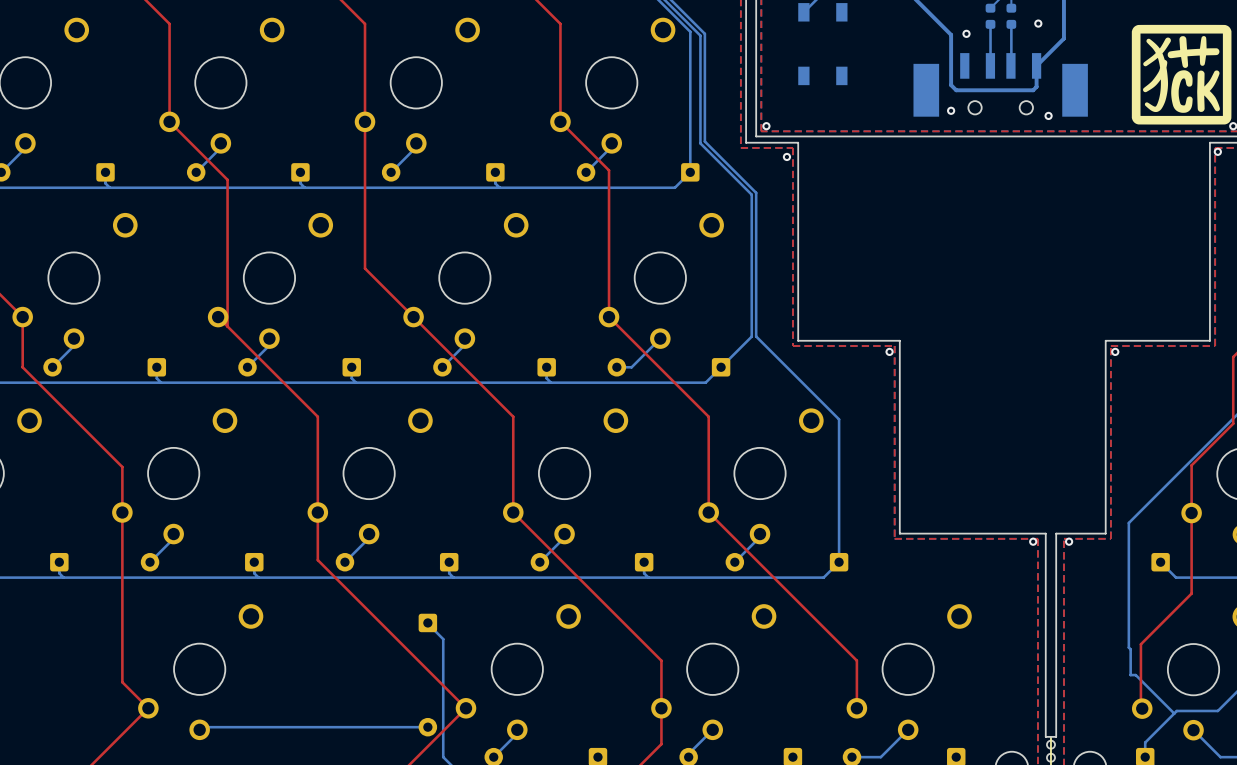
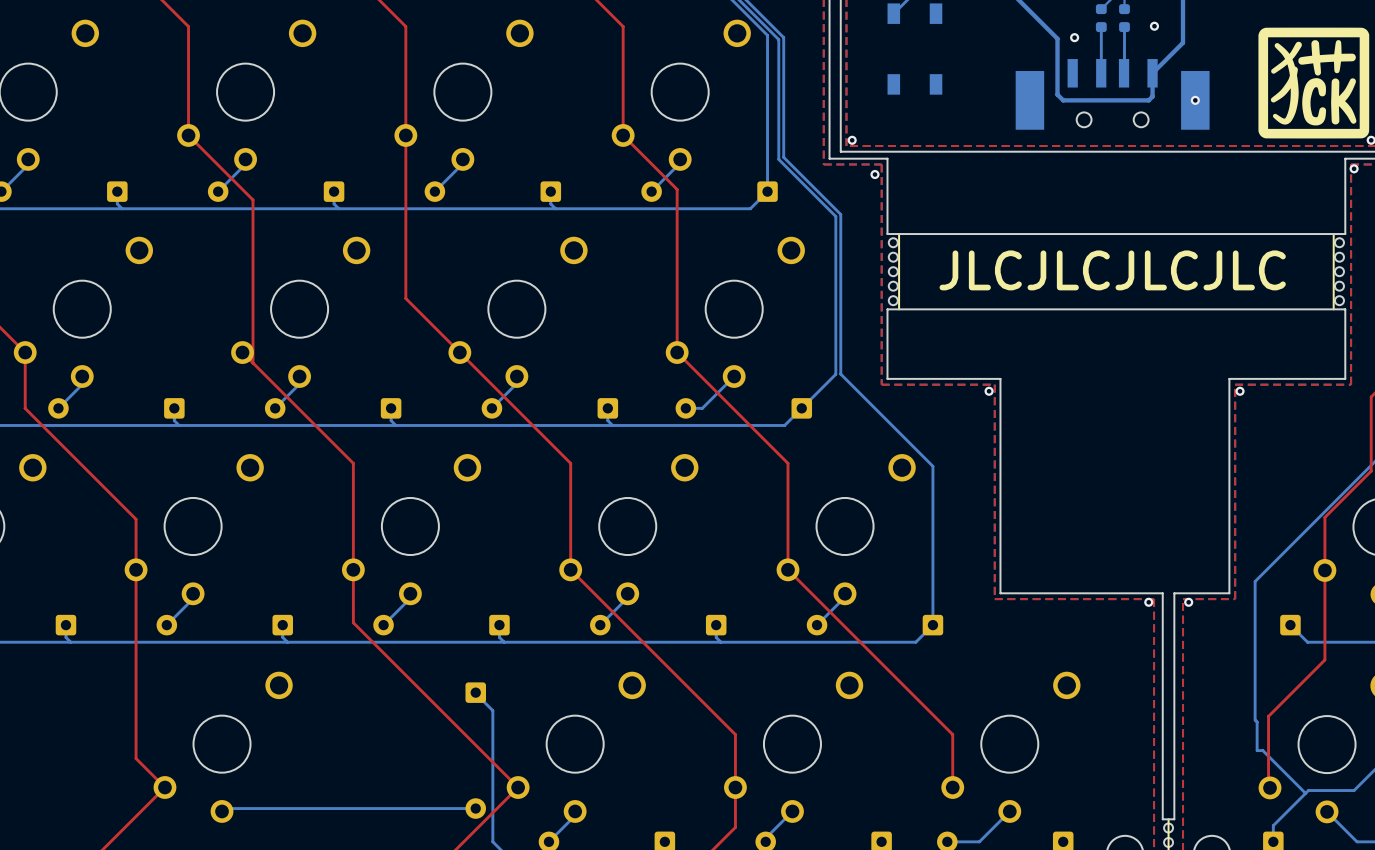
via: (951, 110) -> none
via position: (1048, 115) -> (1195, 100)
board edge: (798, 210) (798, 278) -> (887, 234) (1345, 234)
line: none -> (899, 234) (899, 309)
line: none -> (1333, 234) (1333, 309)
board edge: (1209, 210) (1209, 278) -> (887, 309) (1345, 309)
text: none -> JLCJLCJLCJLC (1112, 270)
part: none -> (893, 271)
part: none -> (1339, 271)

